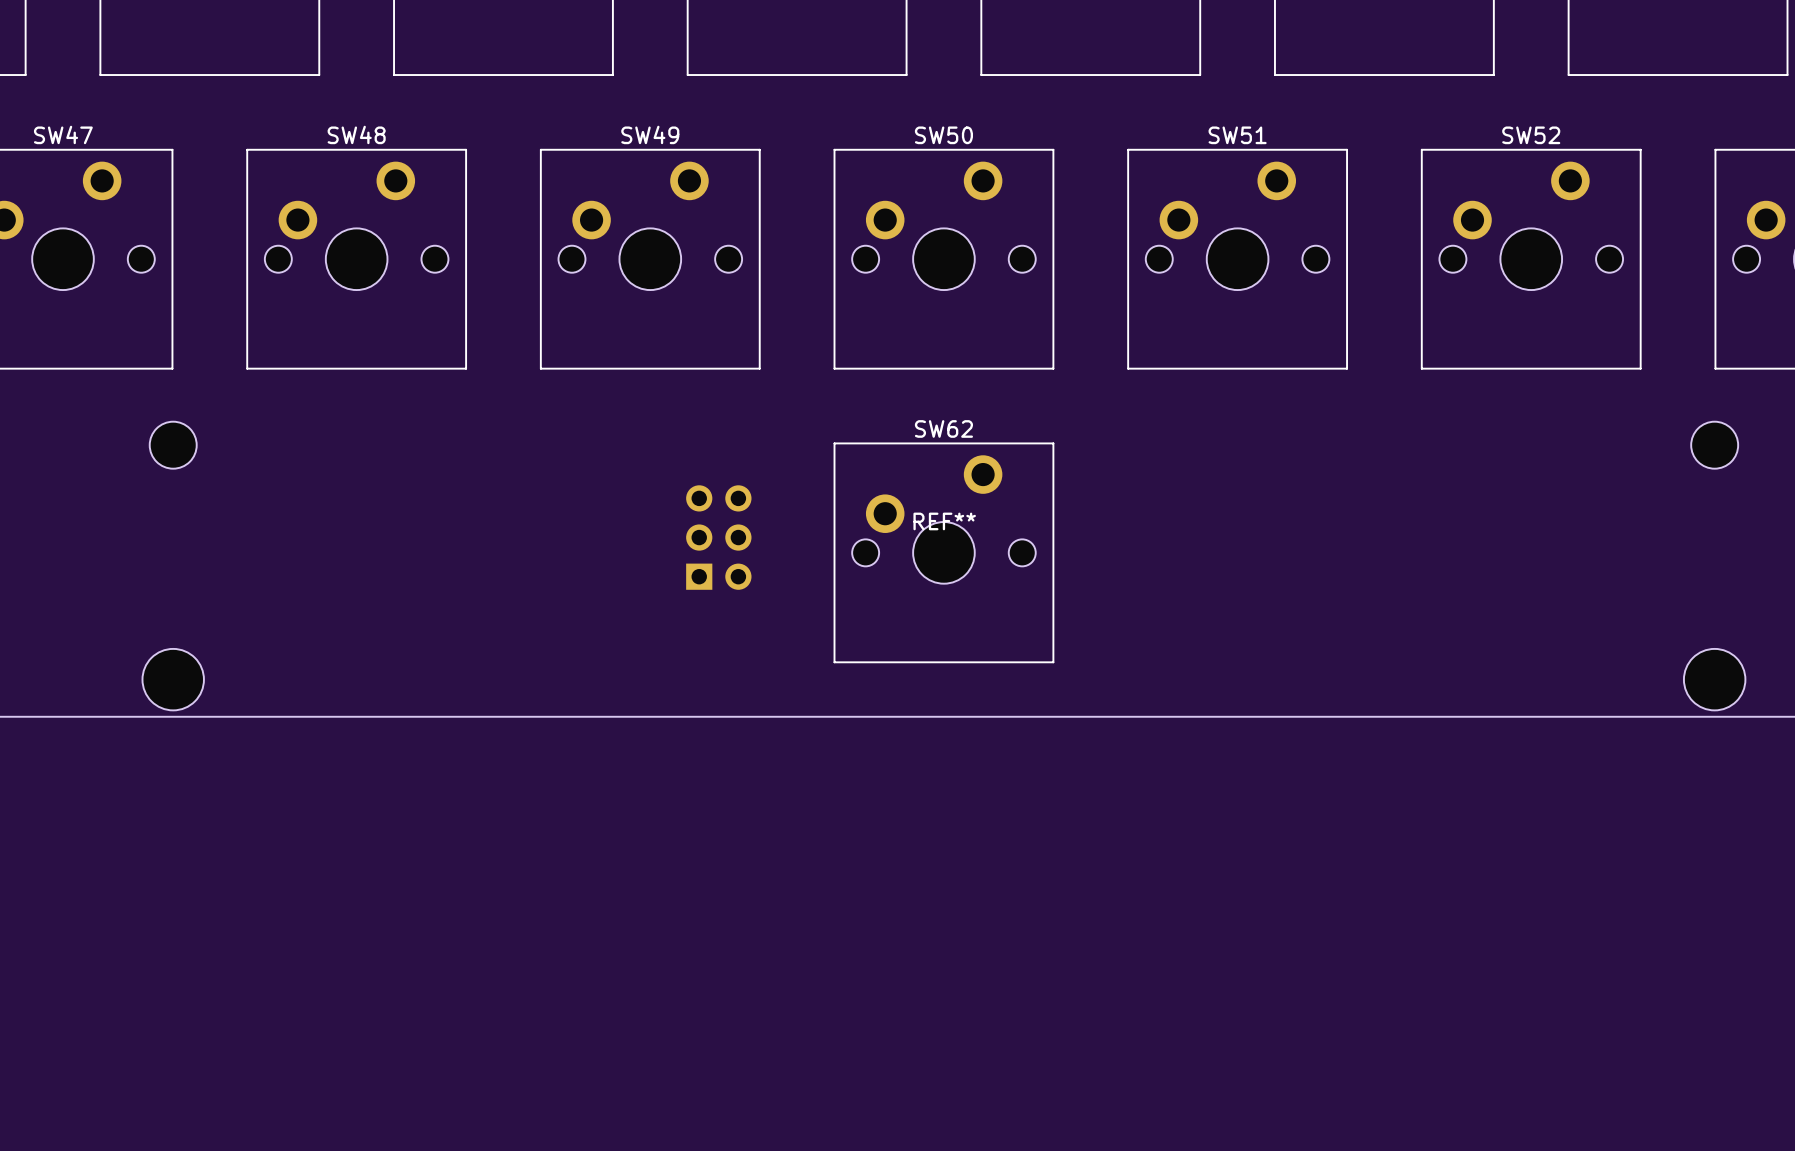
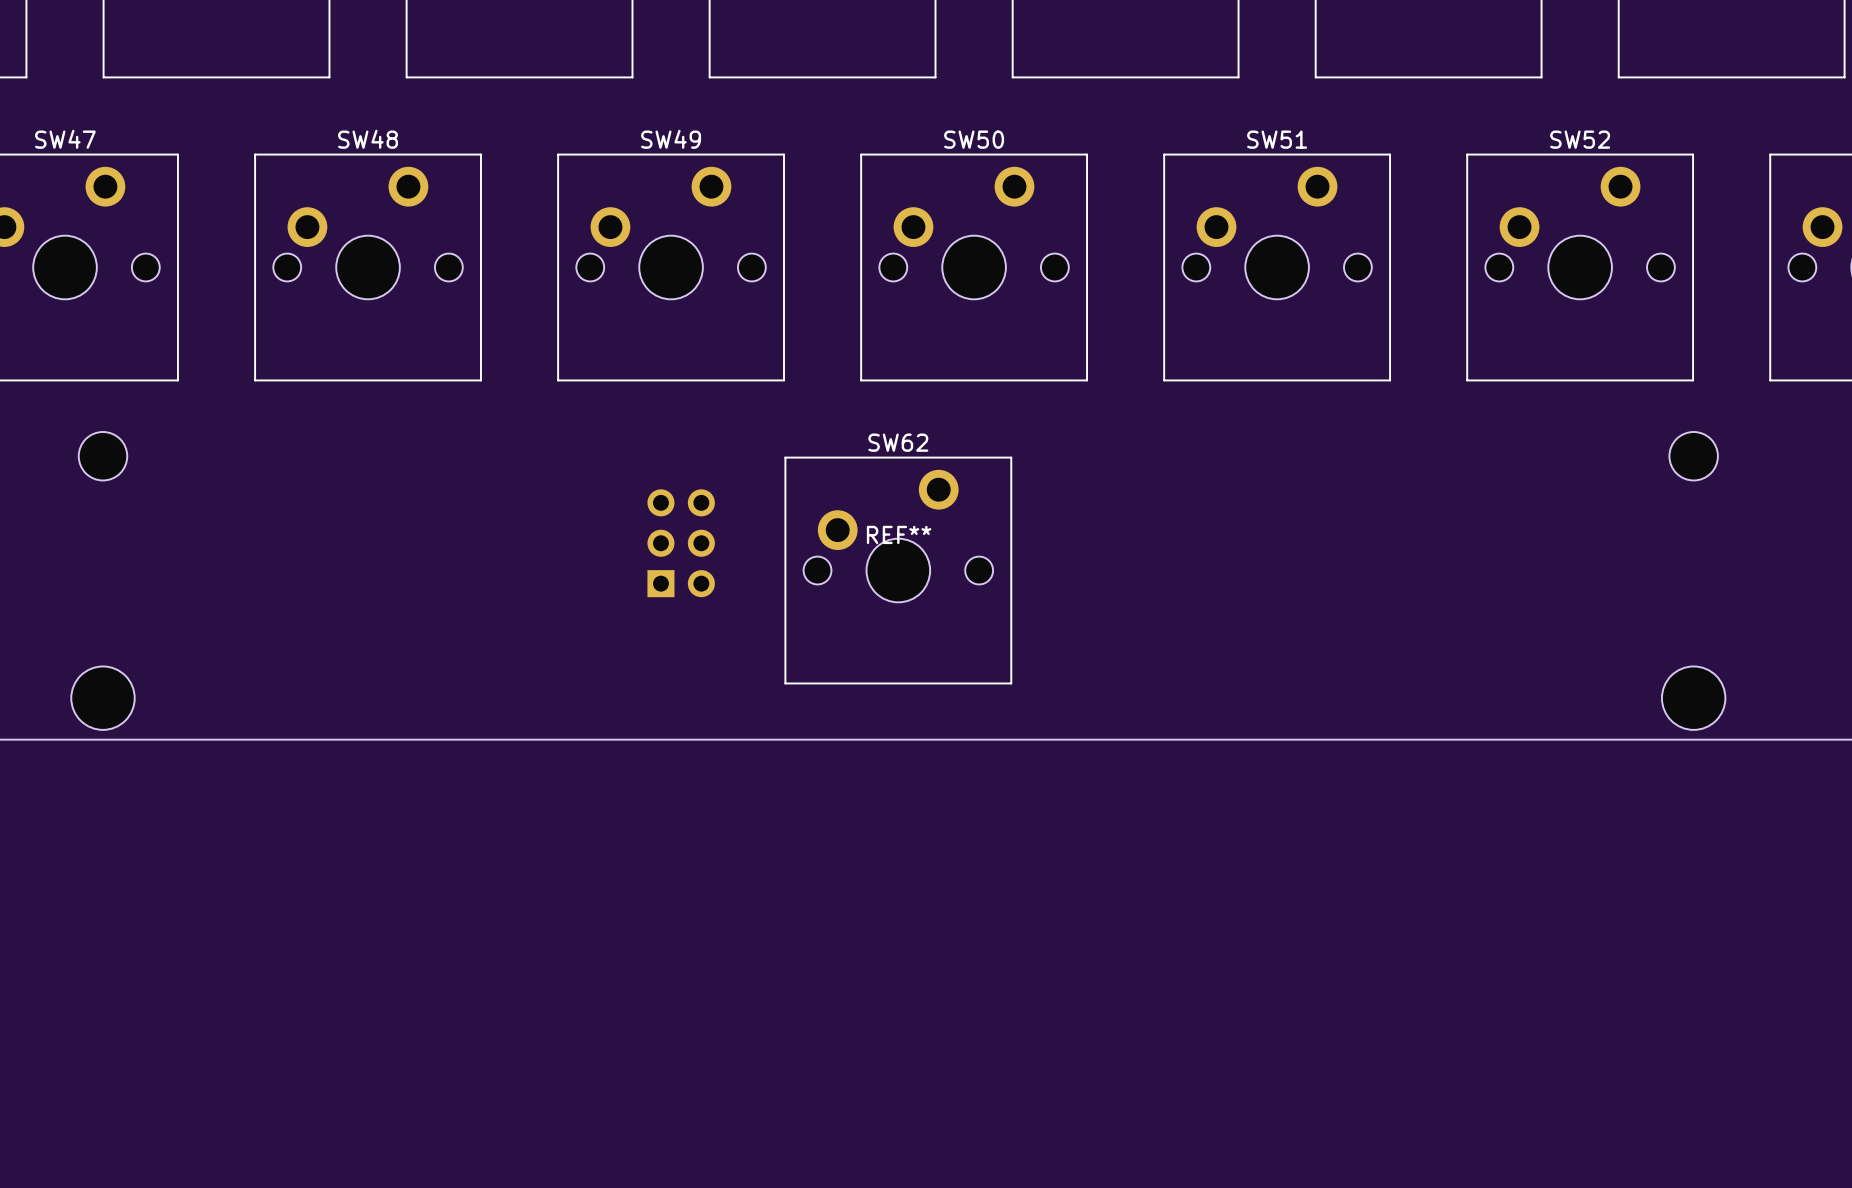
part position: (718, 537) -> (681, 543)
SW62 position: (943, 552) -> (898, 570)
REF** position: (943, 566) -> (898, 580)

